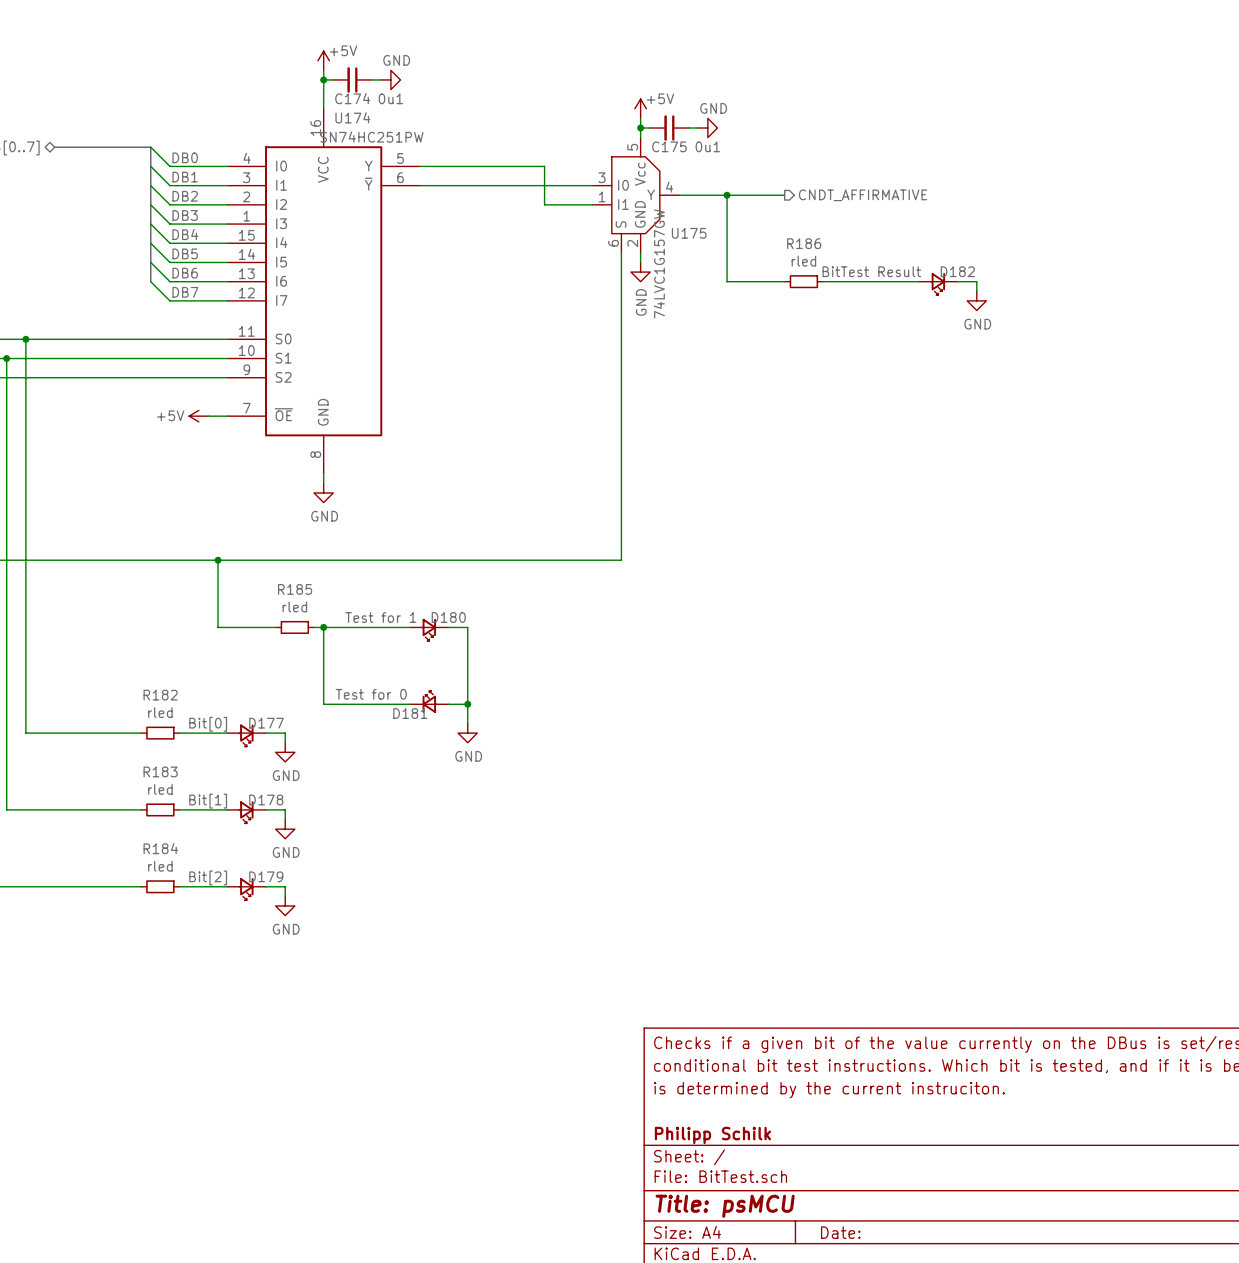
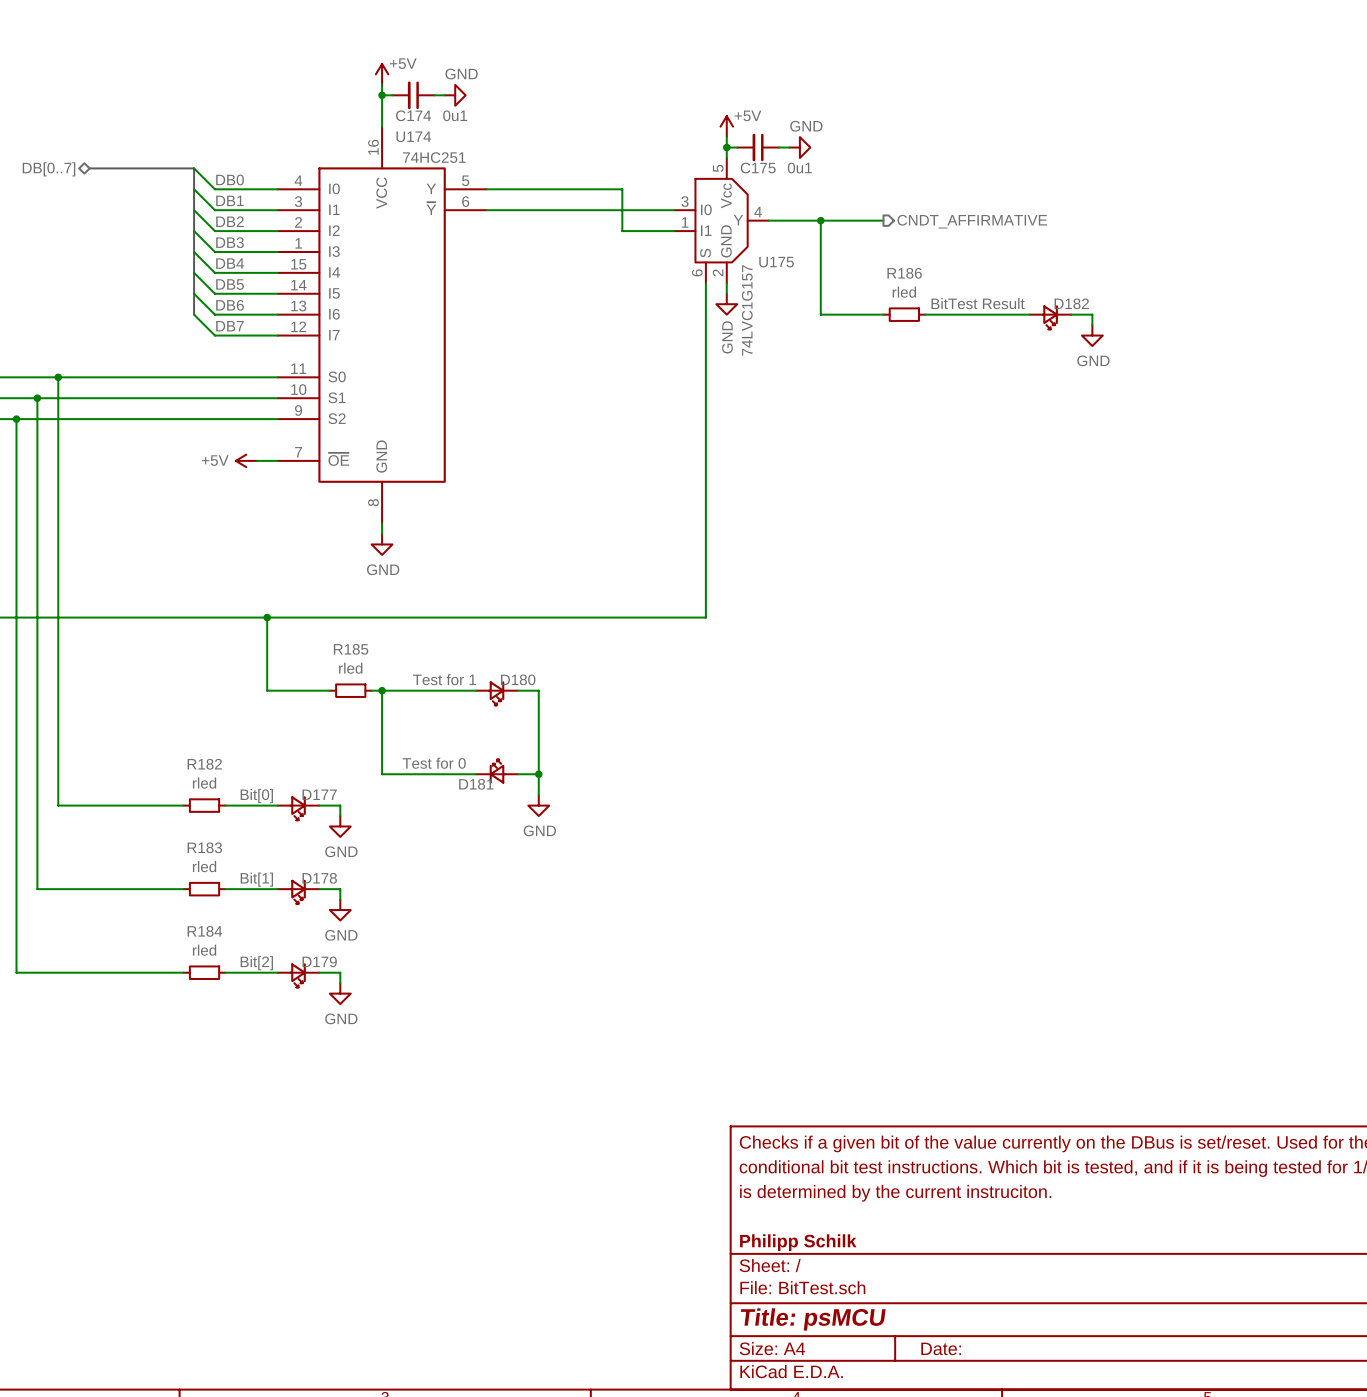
U174 value: SN74HC251PW (371, 137) -> 74HC251 (434, 157)
U175 value: 74LVC1G157GW (659, 264) -> 74LVC1G157 (747, 310)

